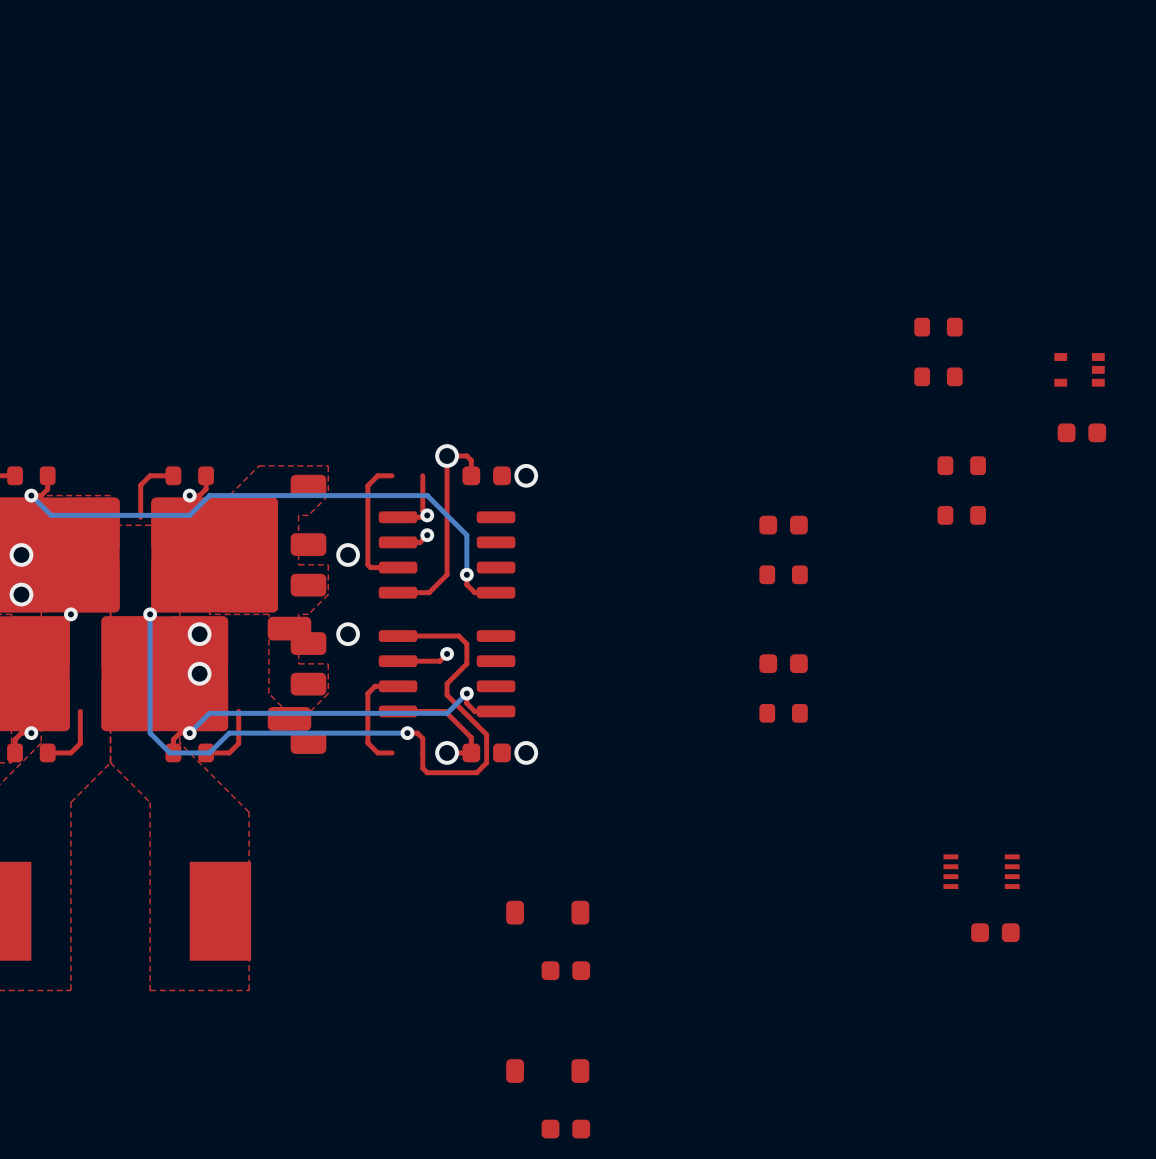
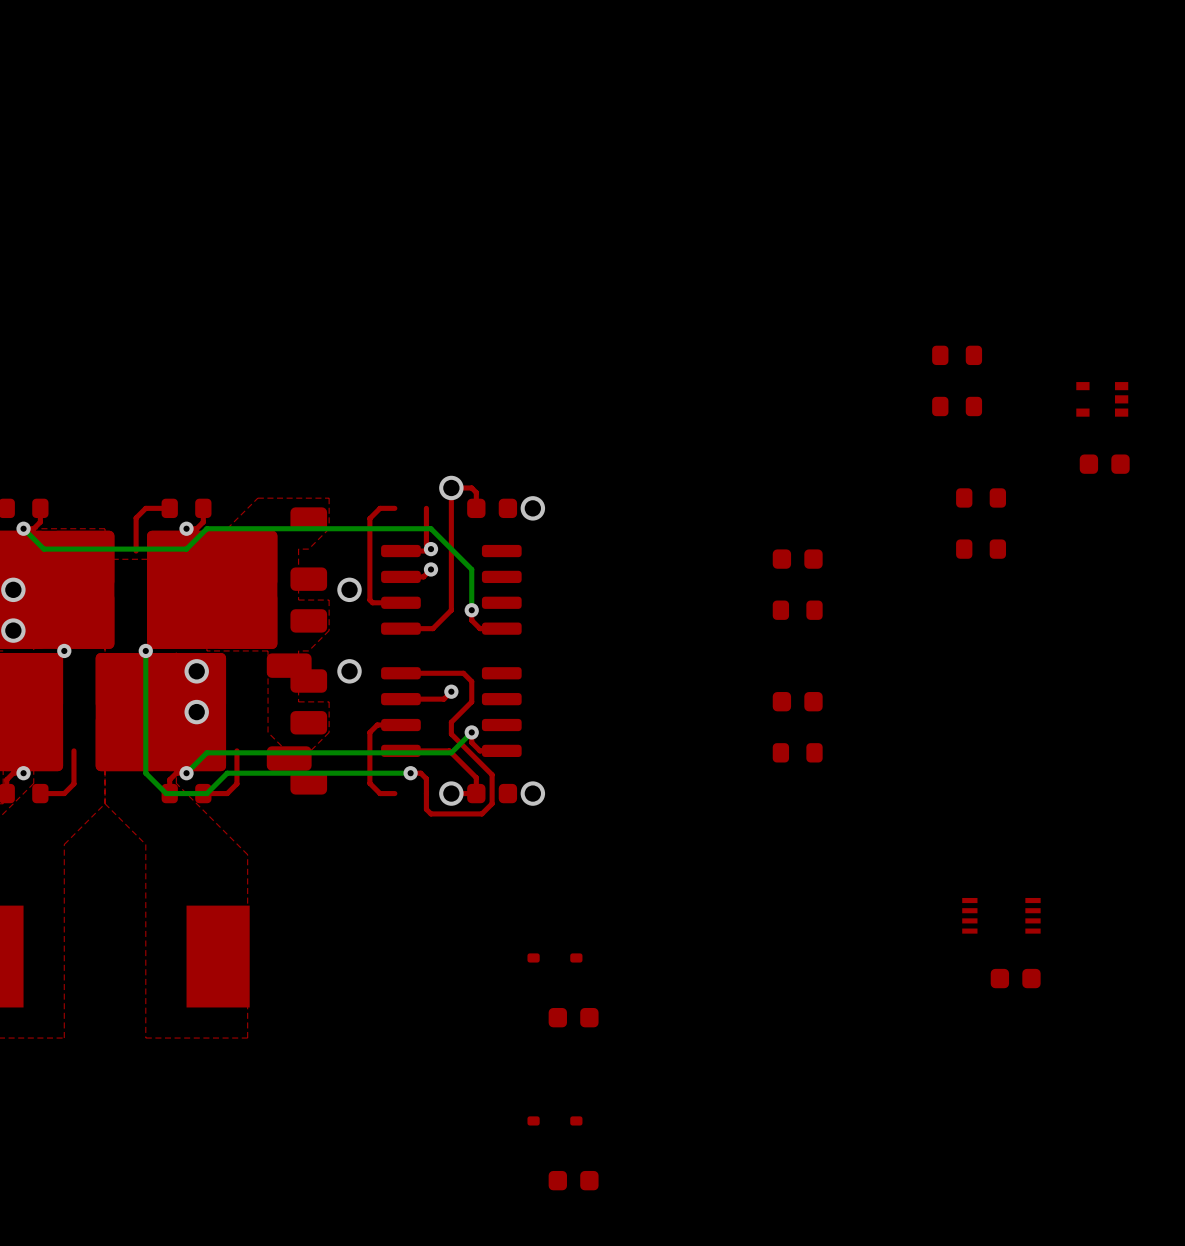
part footprint: [506, 900, 590, 925] -> [527, 953, 583, 963]
part footprint: [506, 1059, 590, 1083] -> [527, 1116, 583, 1126]

